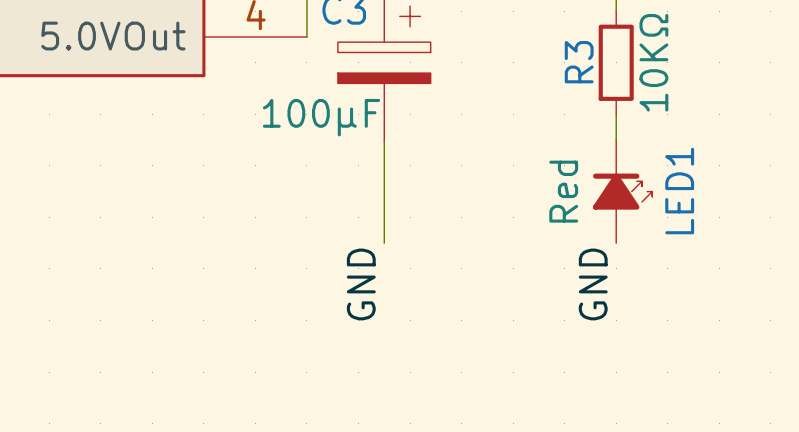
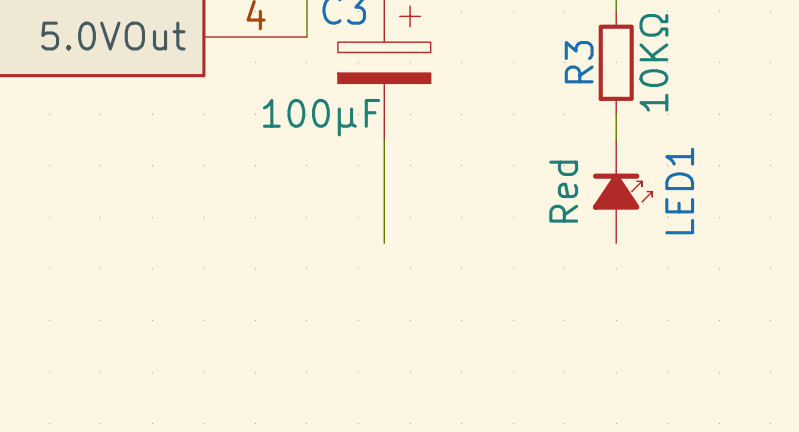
label: GND (361, 284) -> none
label: GND (593, 284) -> none

